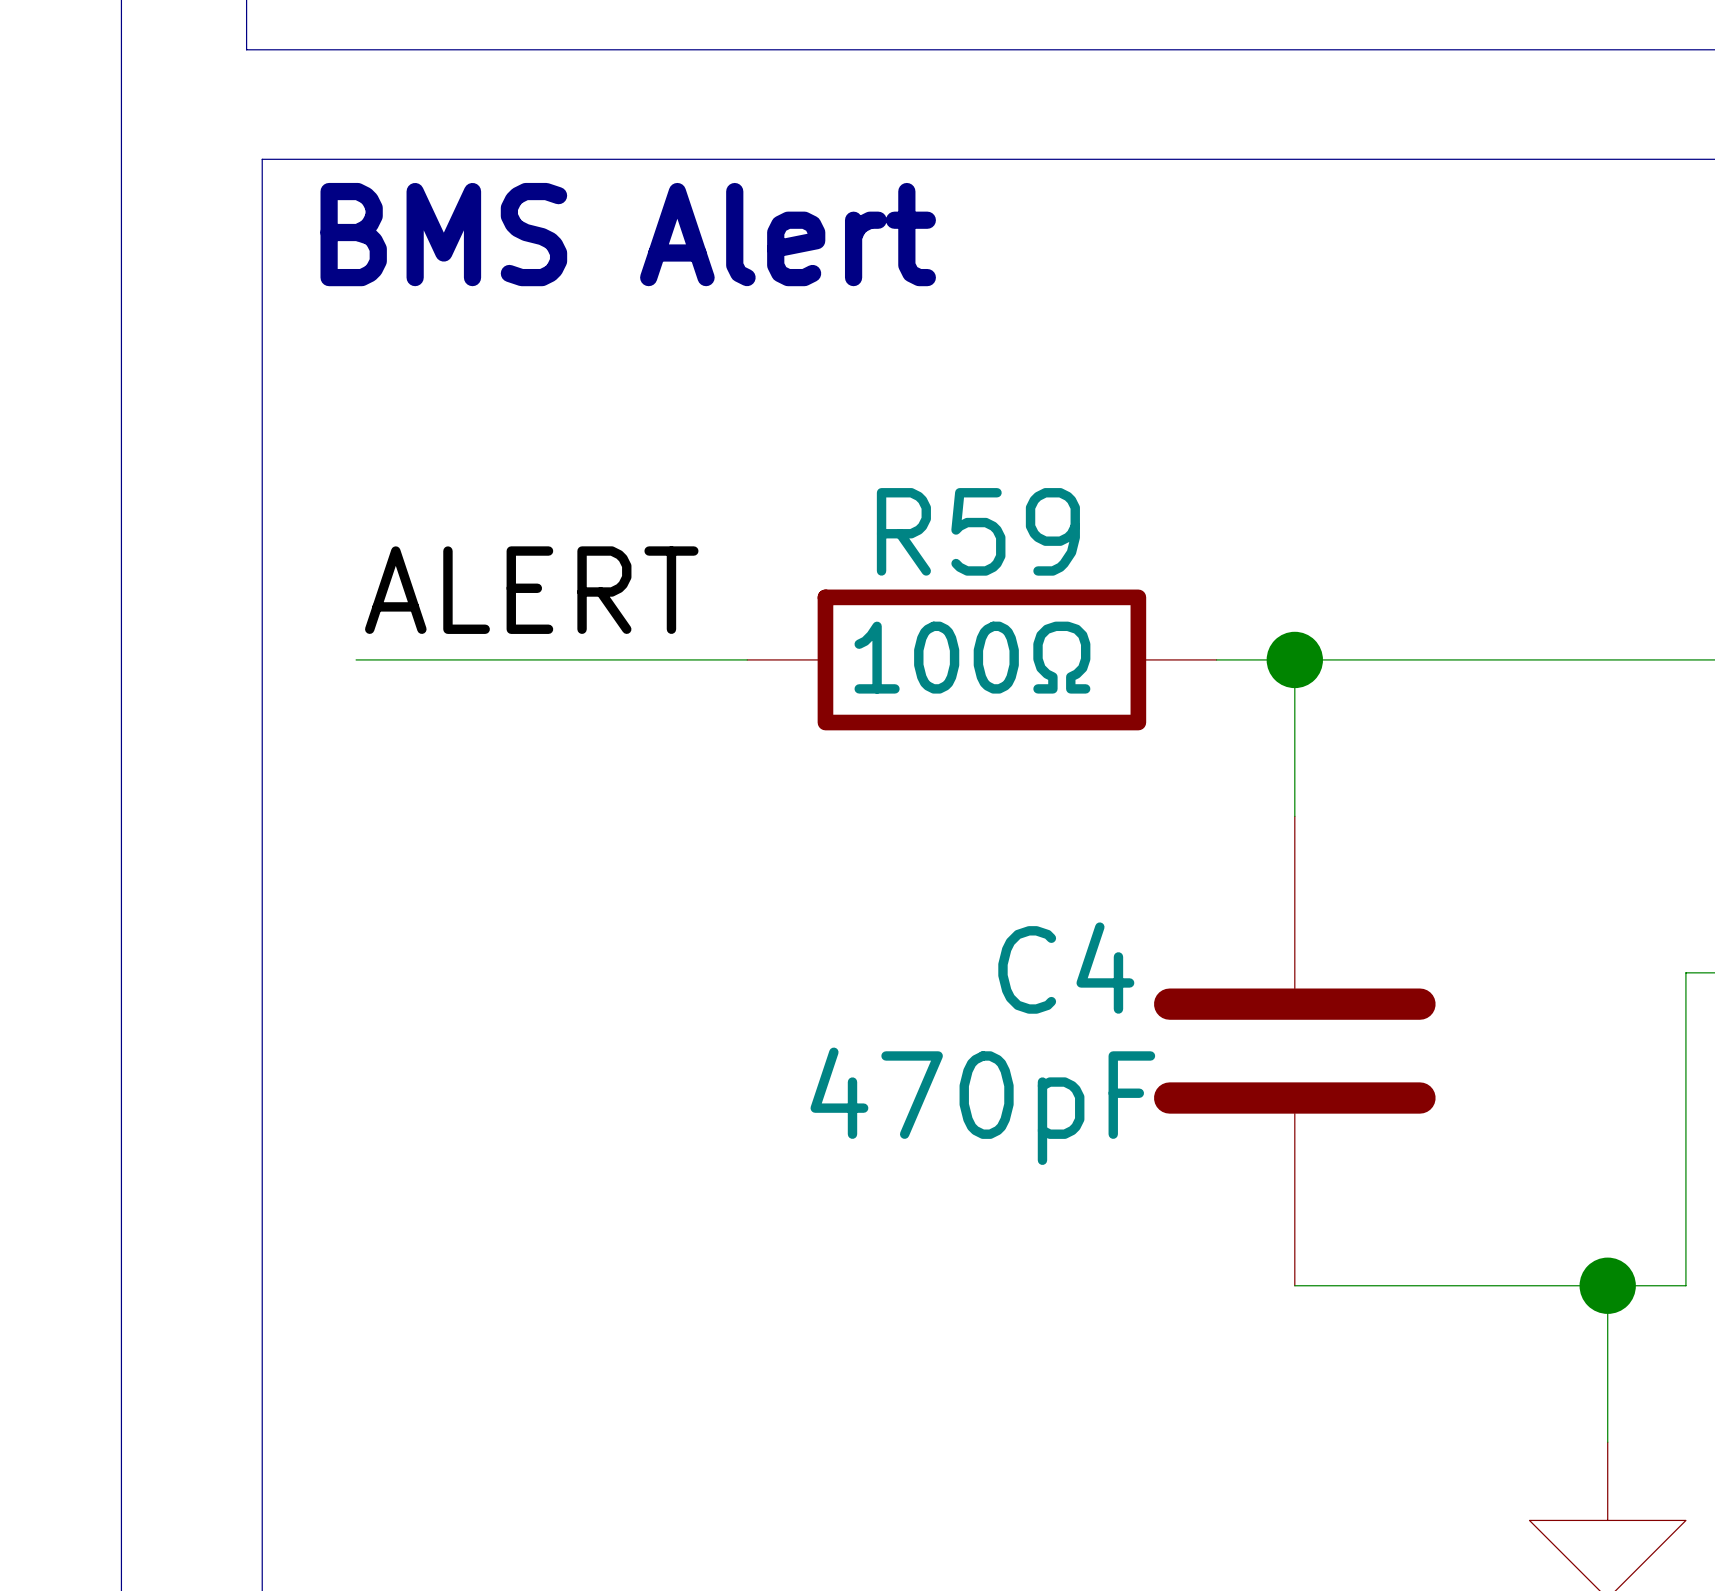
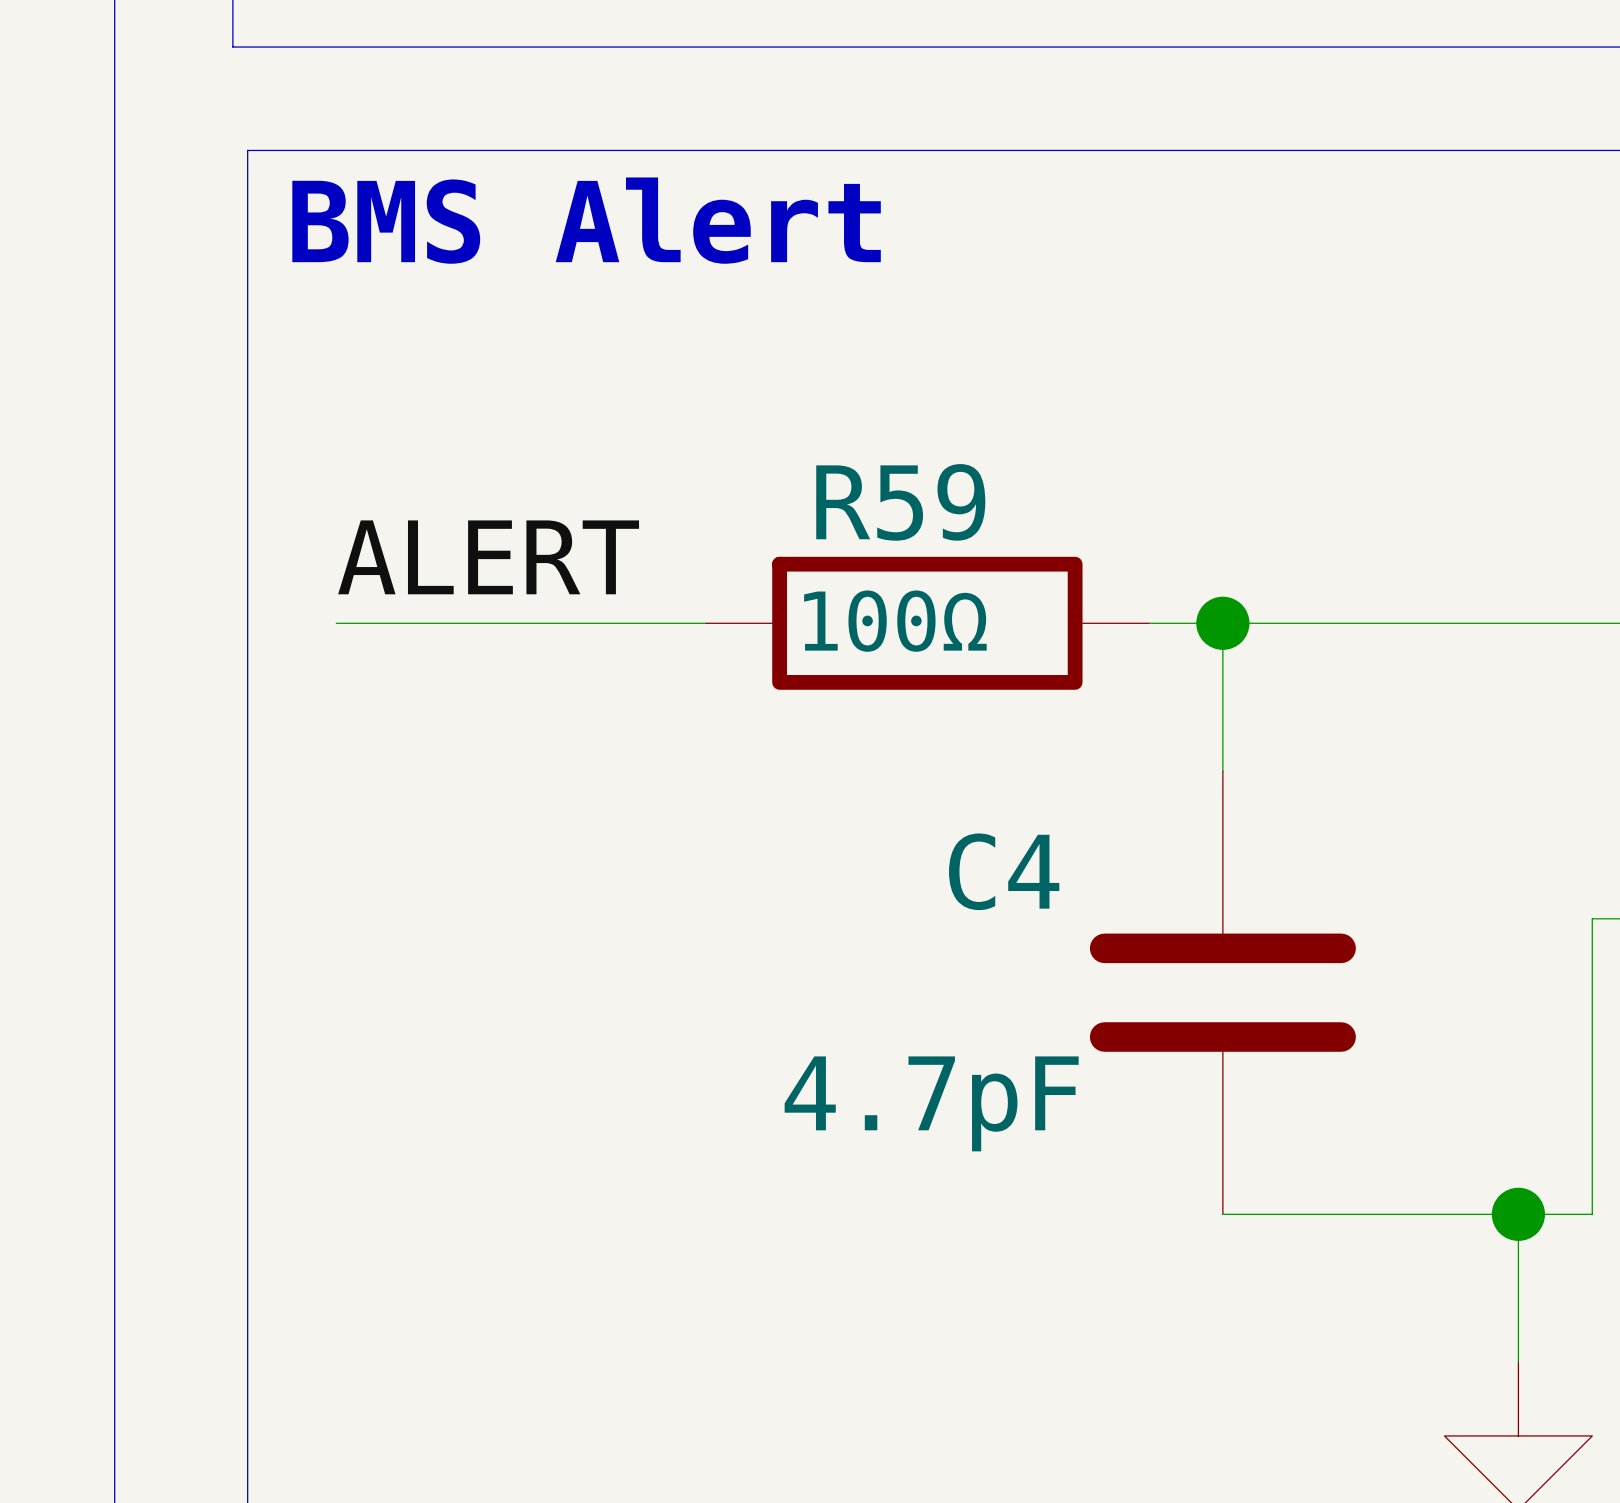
C4 name position: C4 (1066, 968) -> C4 (1004, 871)
C4 value: 470pF (982, 1106) -> 4.7pF (931, 1103)

